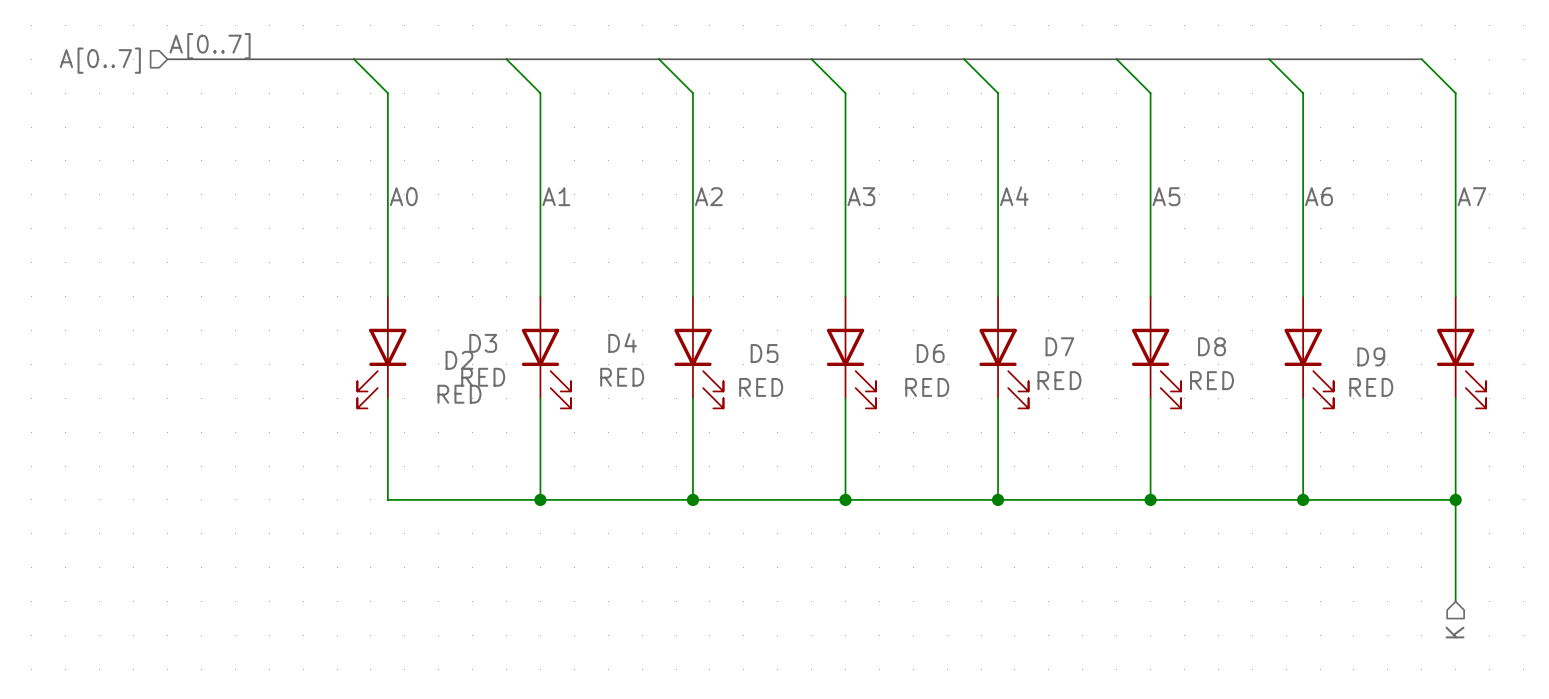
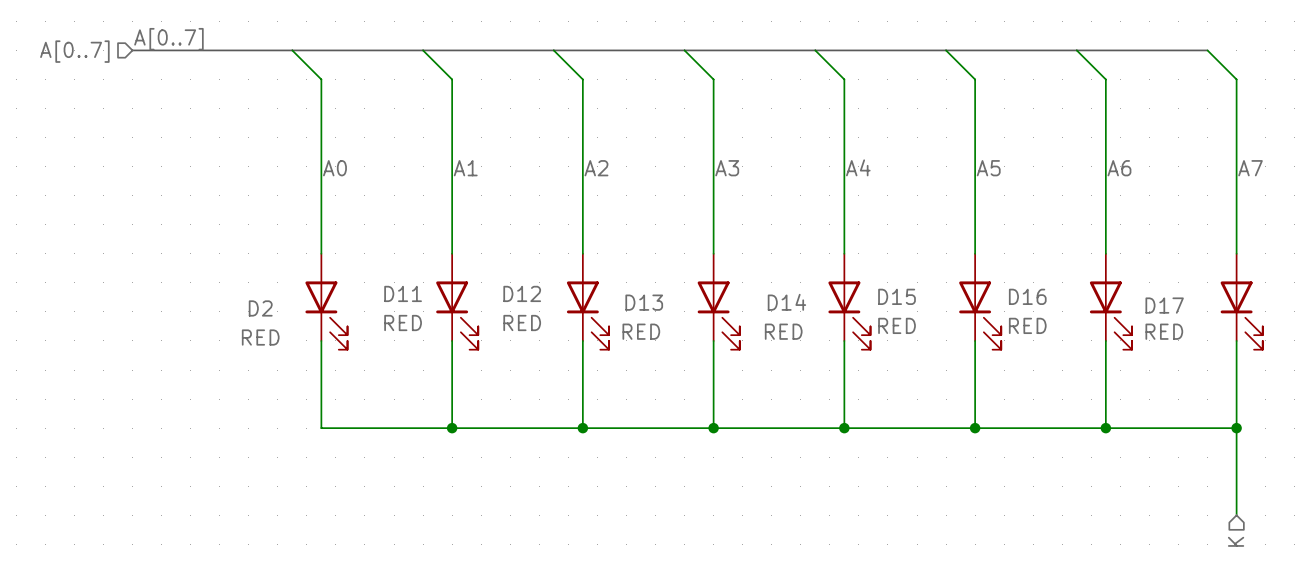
D4 name: D4 (622, 342) -> D12 (522, 293)
D3 name: D3 (483, 343) -> D11 (403, 293)
D7 name: D7 (1059, 346) -> D15 (897, 296)
D8 name: D8 (1211, 346) -> D16 (1027, 296)
D5 name: D5 (764, 353) -> D13 (644, 302)
D6 name: D6 (930, 353) -> D14 (786, 302)
D9 name: D9 (1371, 356) -> D17 (1164, 305)
D2 flip: as is (381, 368) -> left-right (326, 315)

